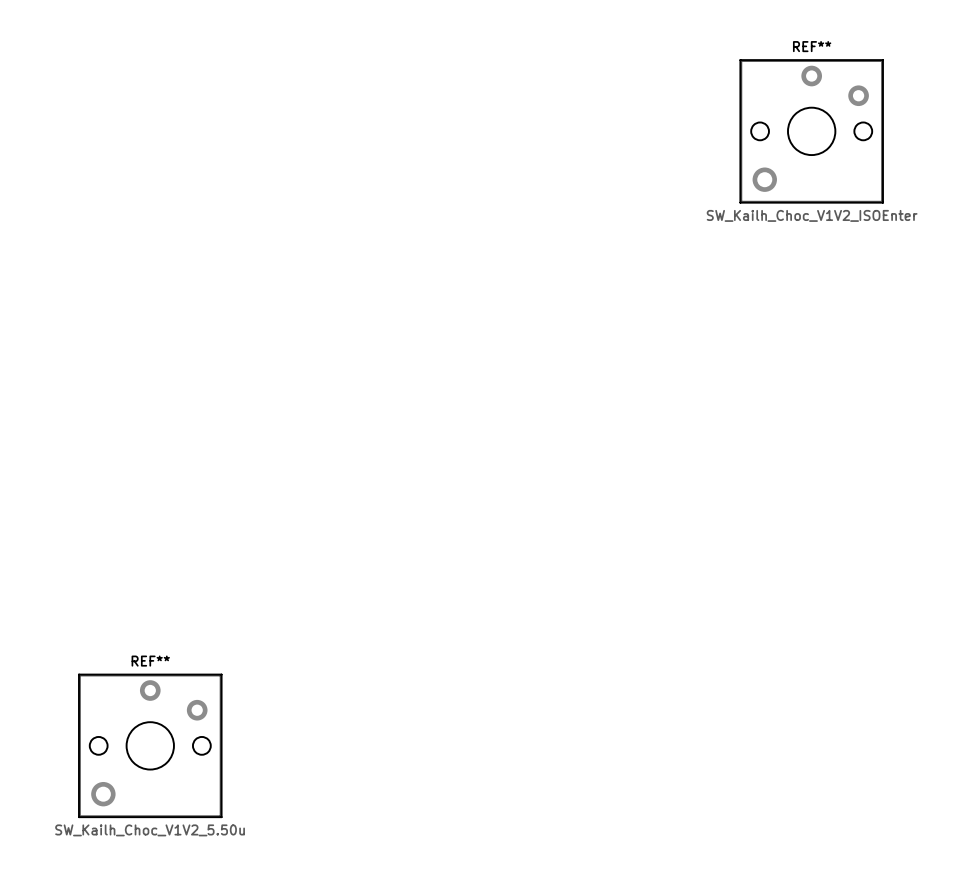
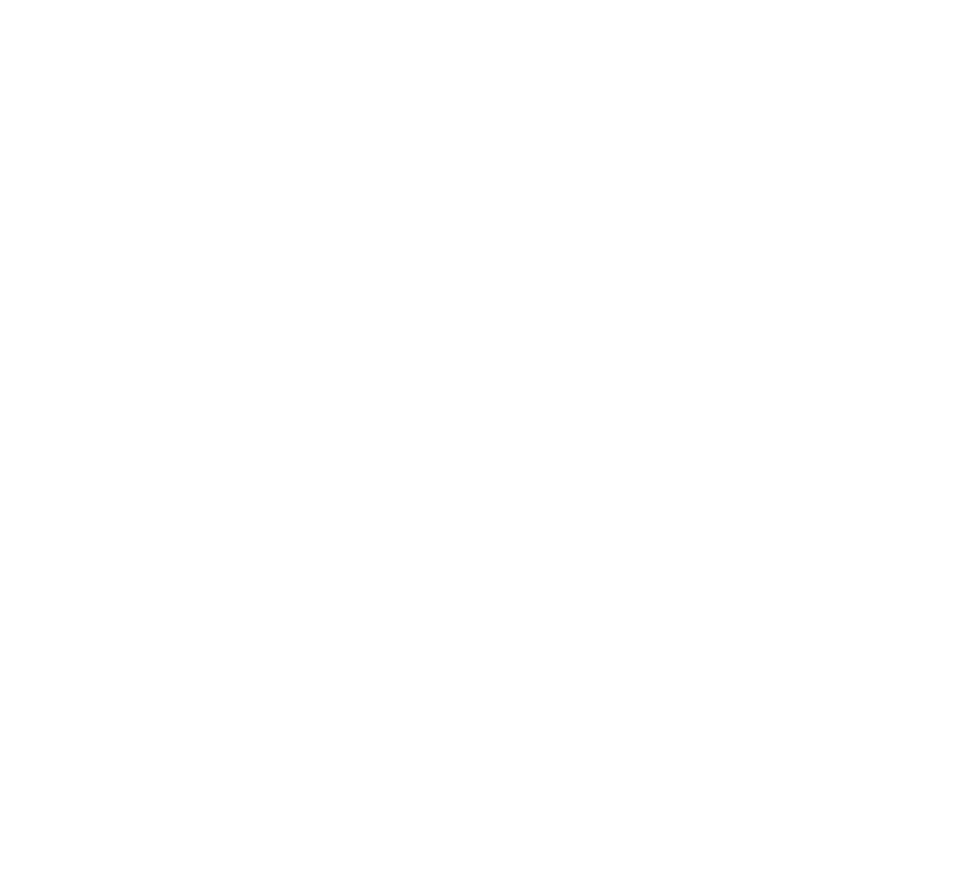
REF**: SW_Kailh_Choc_V1V2_ISOEnter (811, 131) -> none
REF**: SW_Kailh_Choc_V1V2_5.50u (150, 745) -> none

